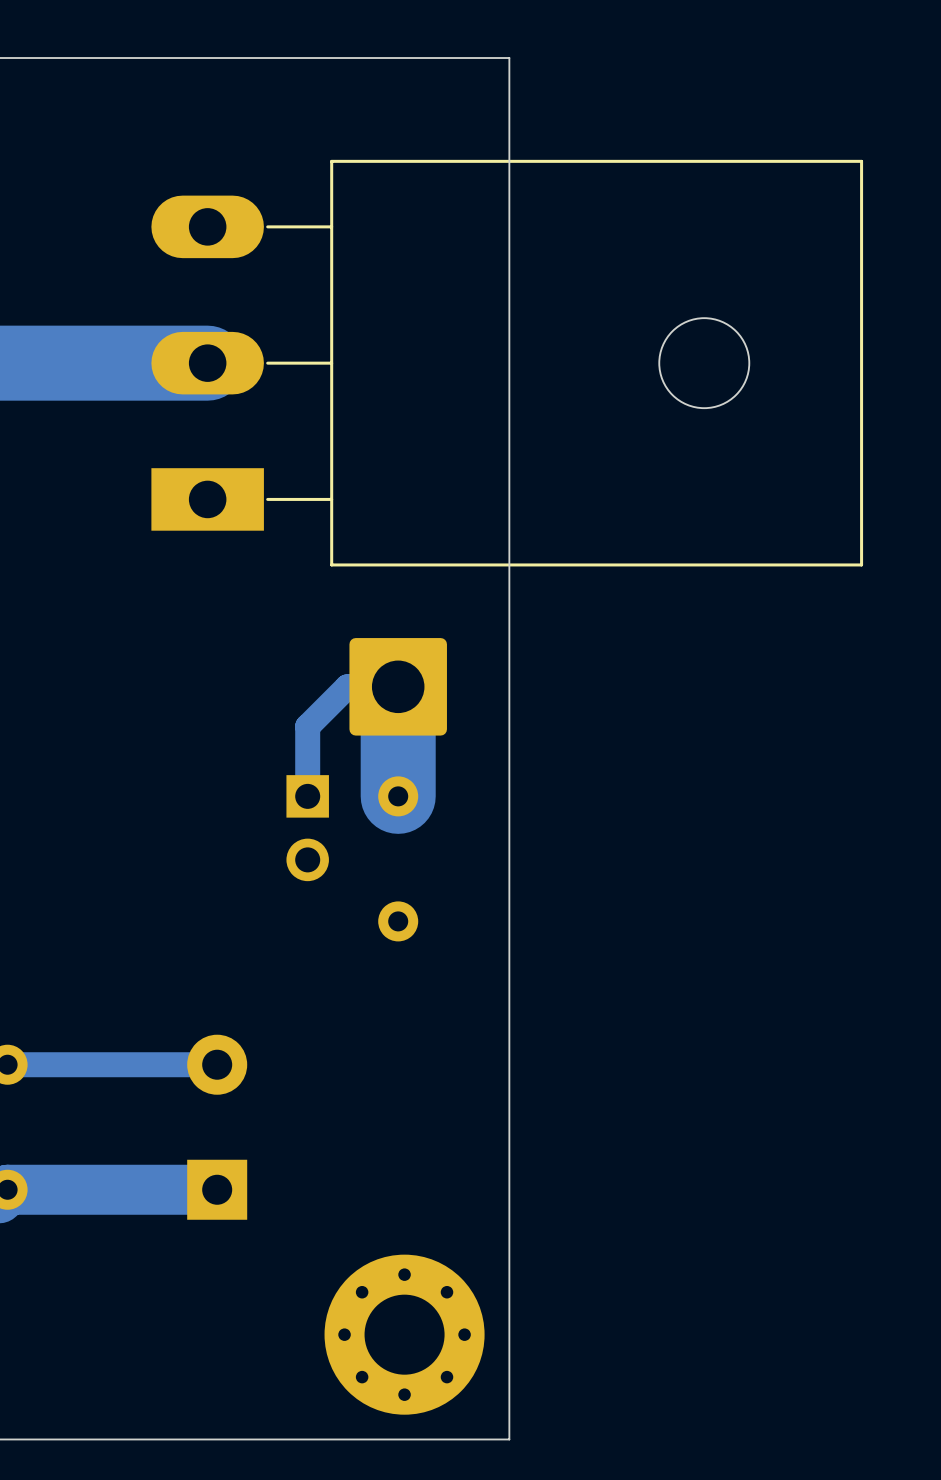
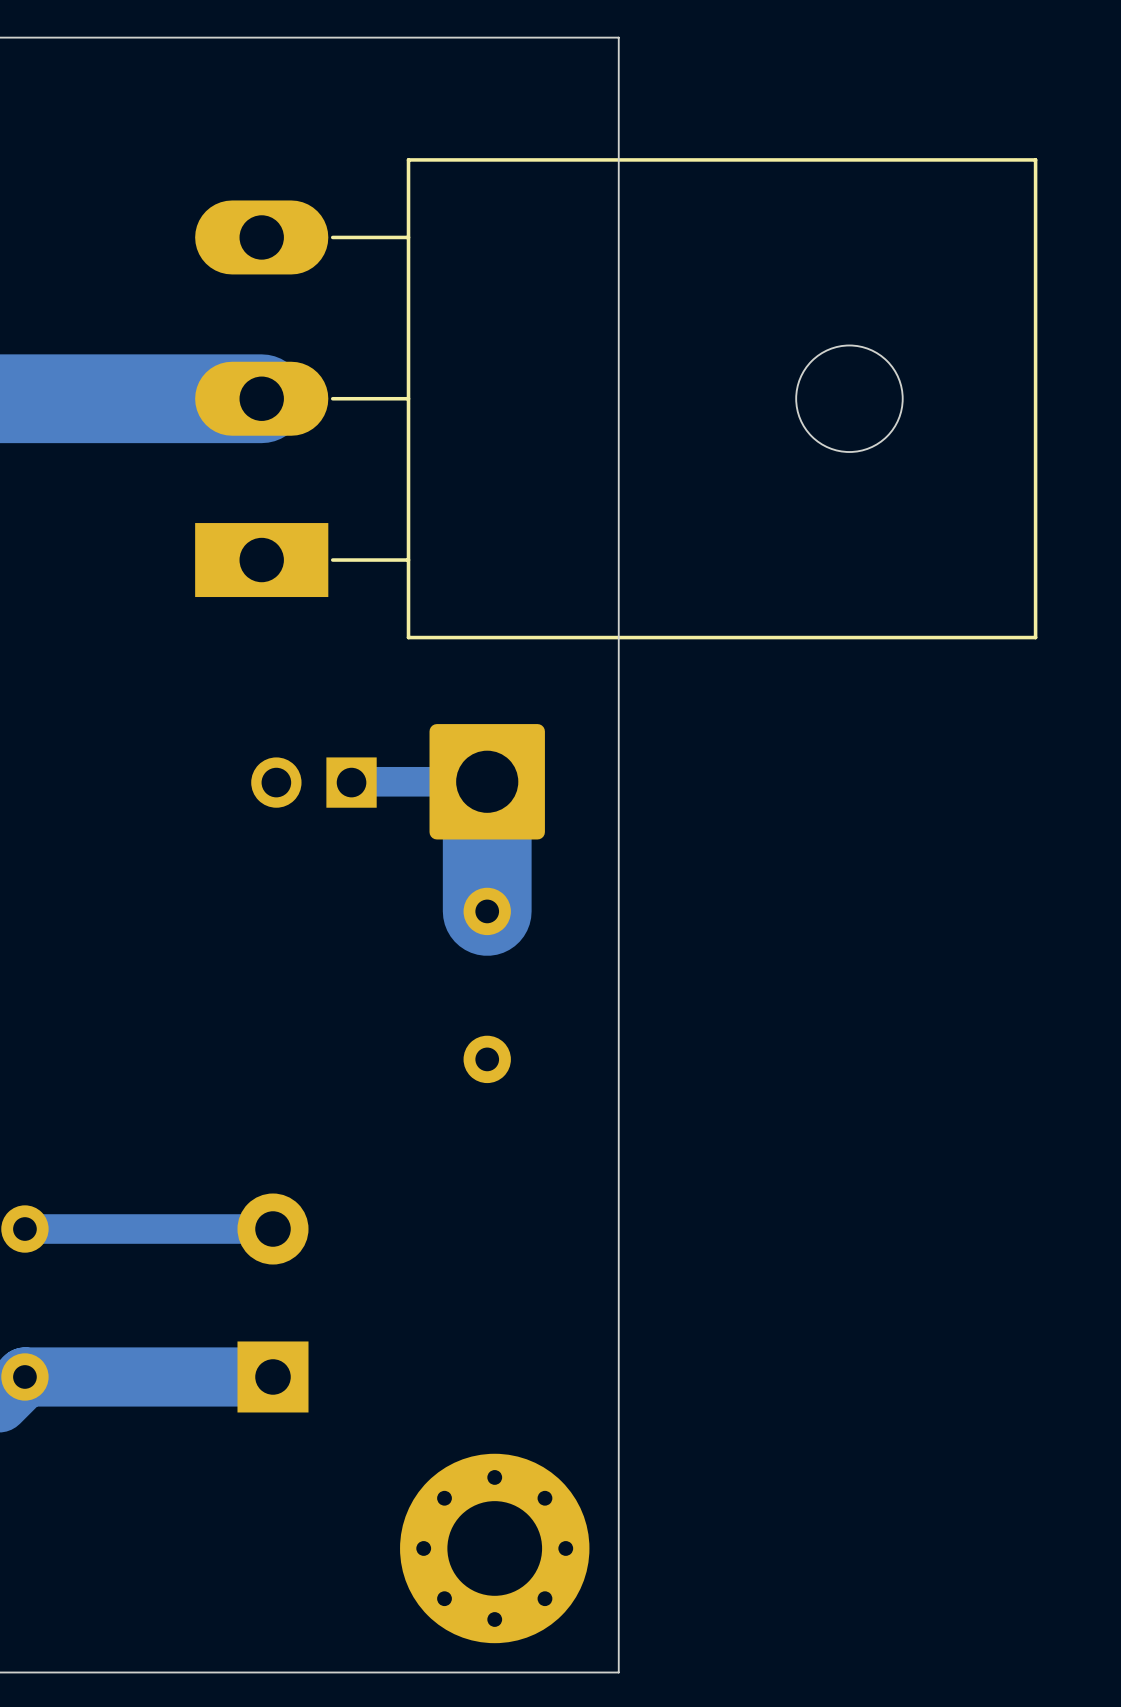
track: (347, 686) (307, 726) (307, 796) -> (427, 781) (351, 782)
part rotation: 0° (307, 828) -> 90° clockwise (313, 782)
part position: (307, 828) -> (313, 782)

